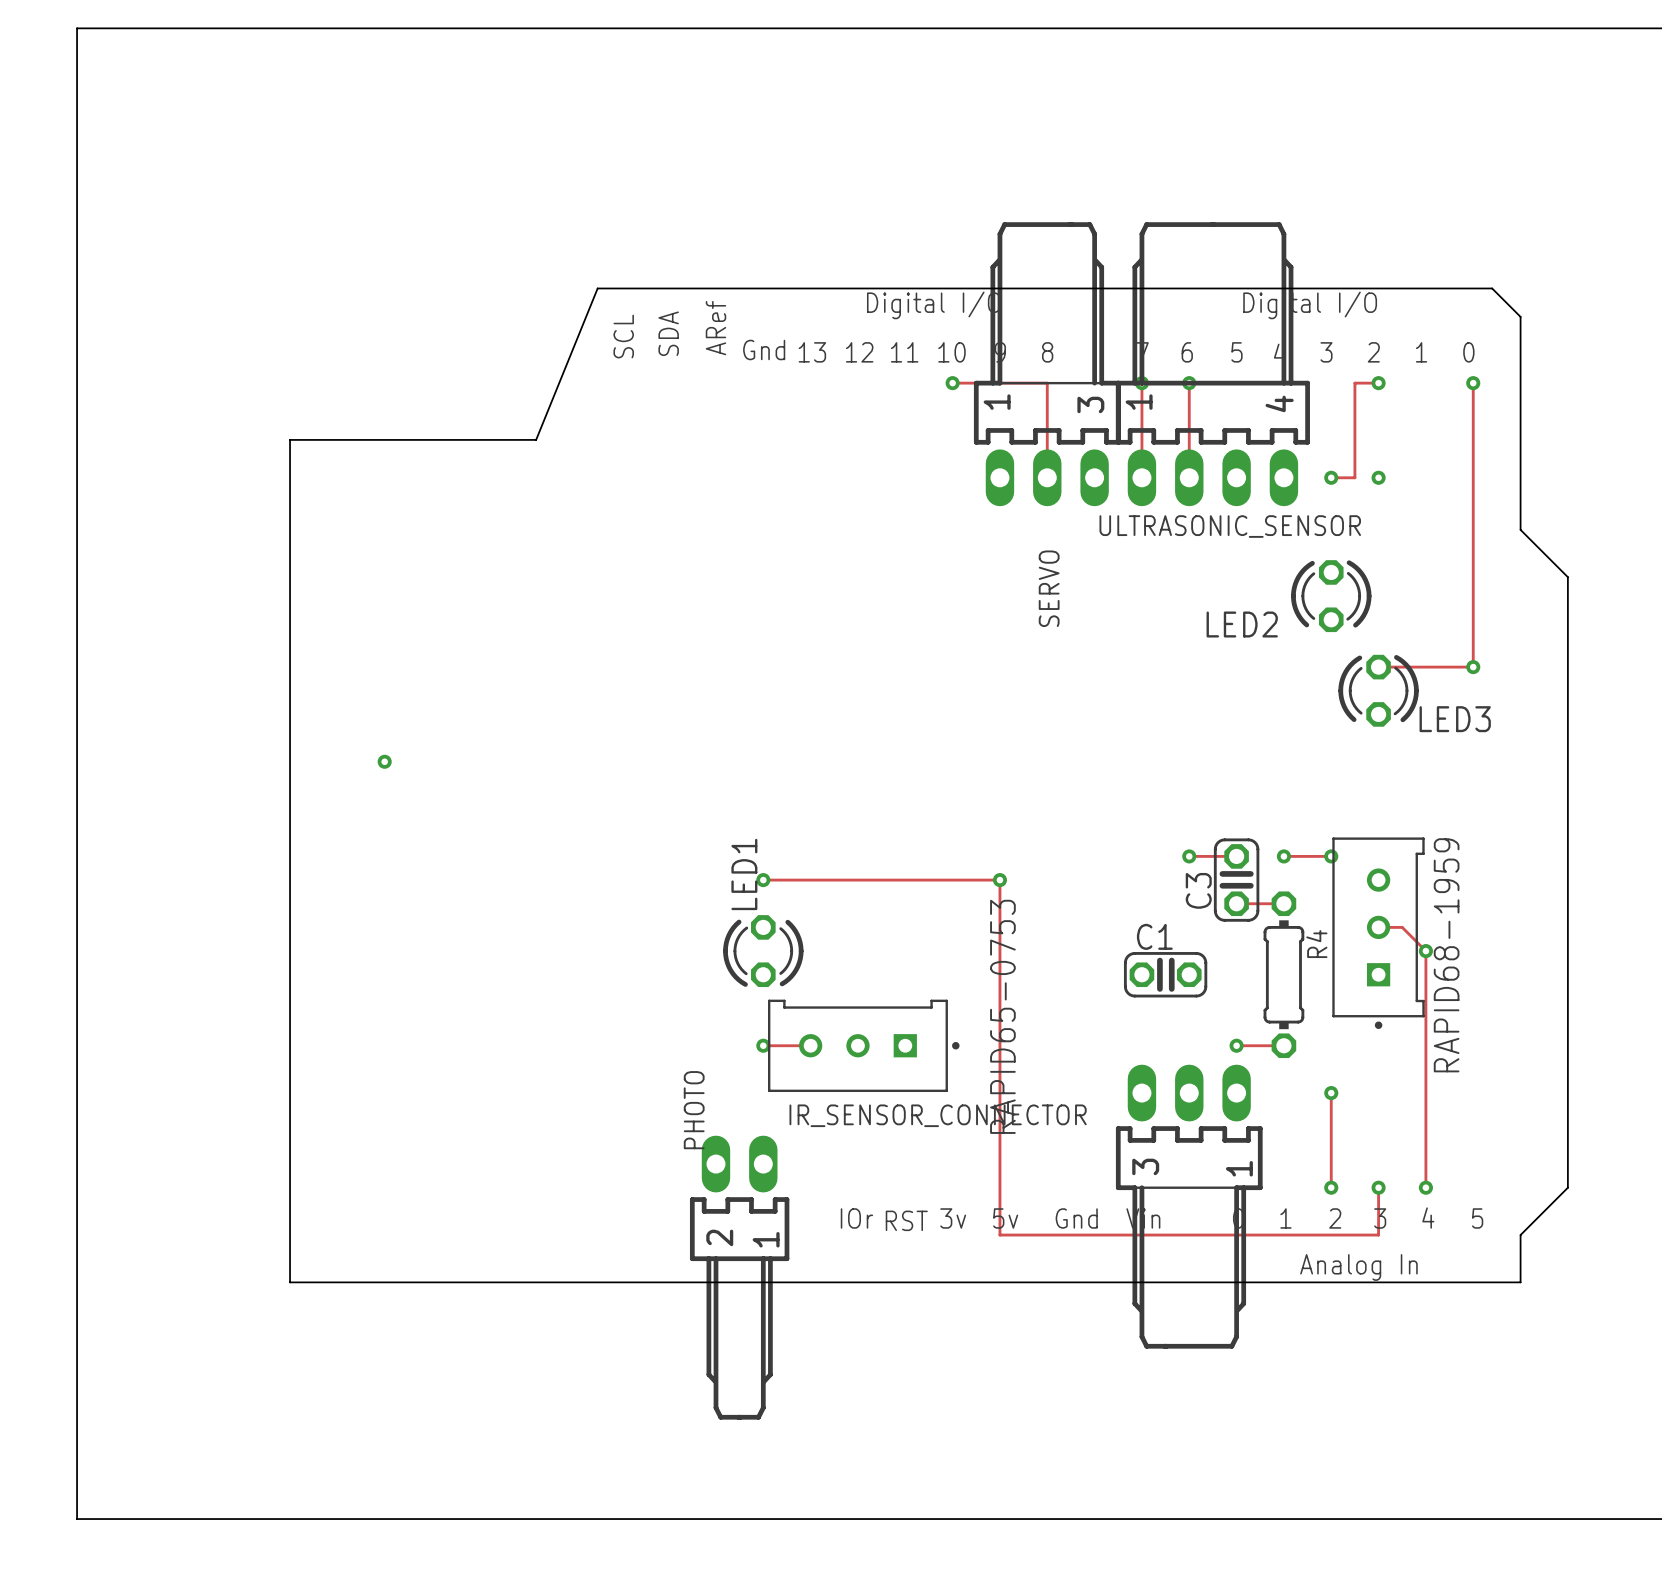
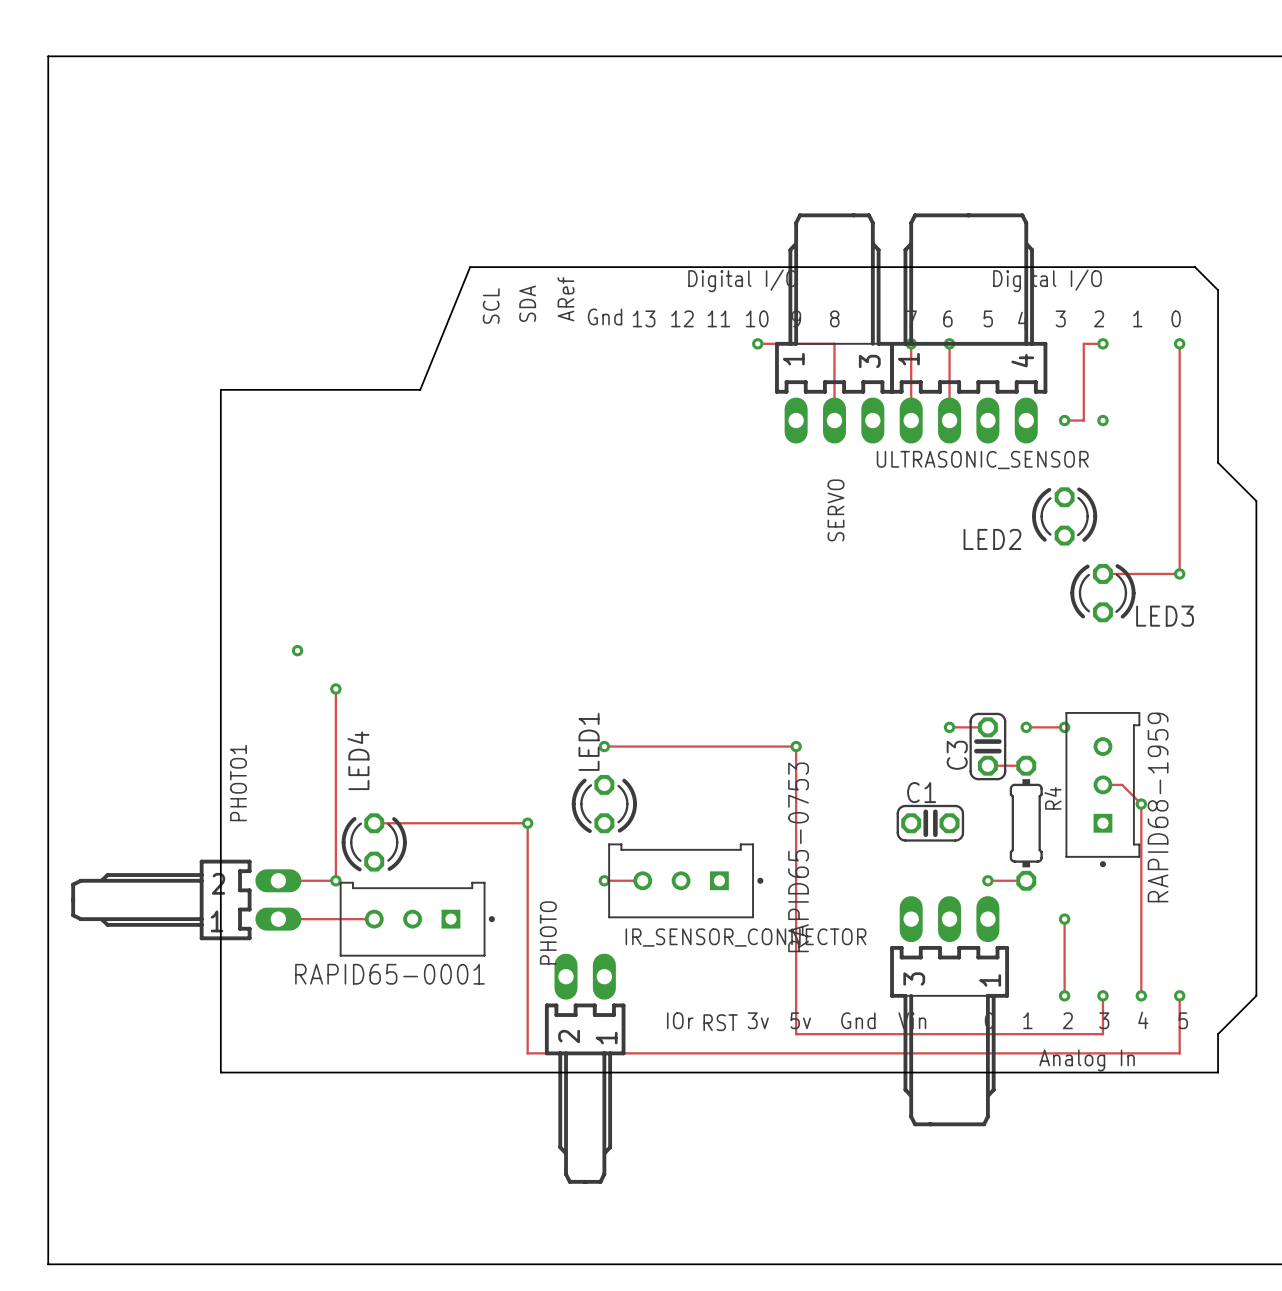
track: none -> (335, 689) (335, 880) (278, 880)
via: none -> (335, 689)
track: none -> (374, 823) (527, 823) (527, 1053) (1179, 1053) (1179, 995)
via: none -> (527, 823)
LED4: none -> (374, 842)
via: none -> (335, 880)
PHOTO1: none -> (186, 899)
track: none -> (278, 919) (374, 919)
RAPID65-0001: none -> (417, 919)
via: none -> (1179, 995)

